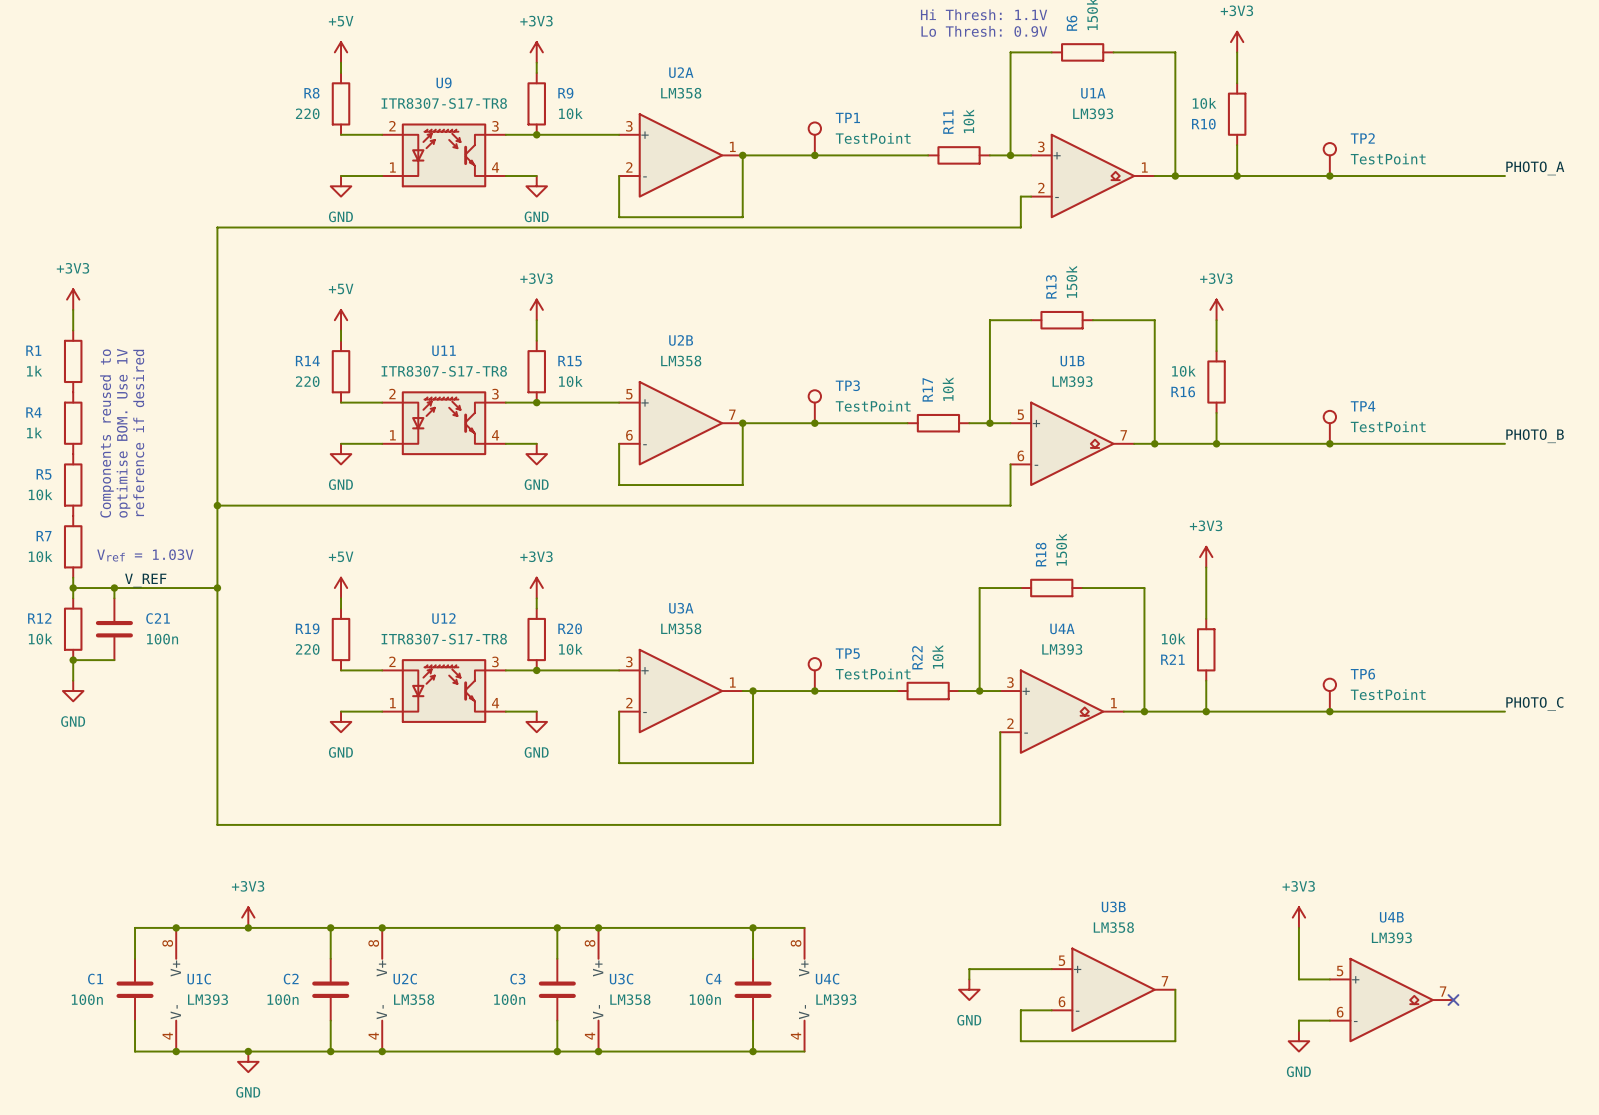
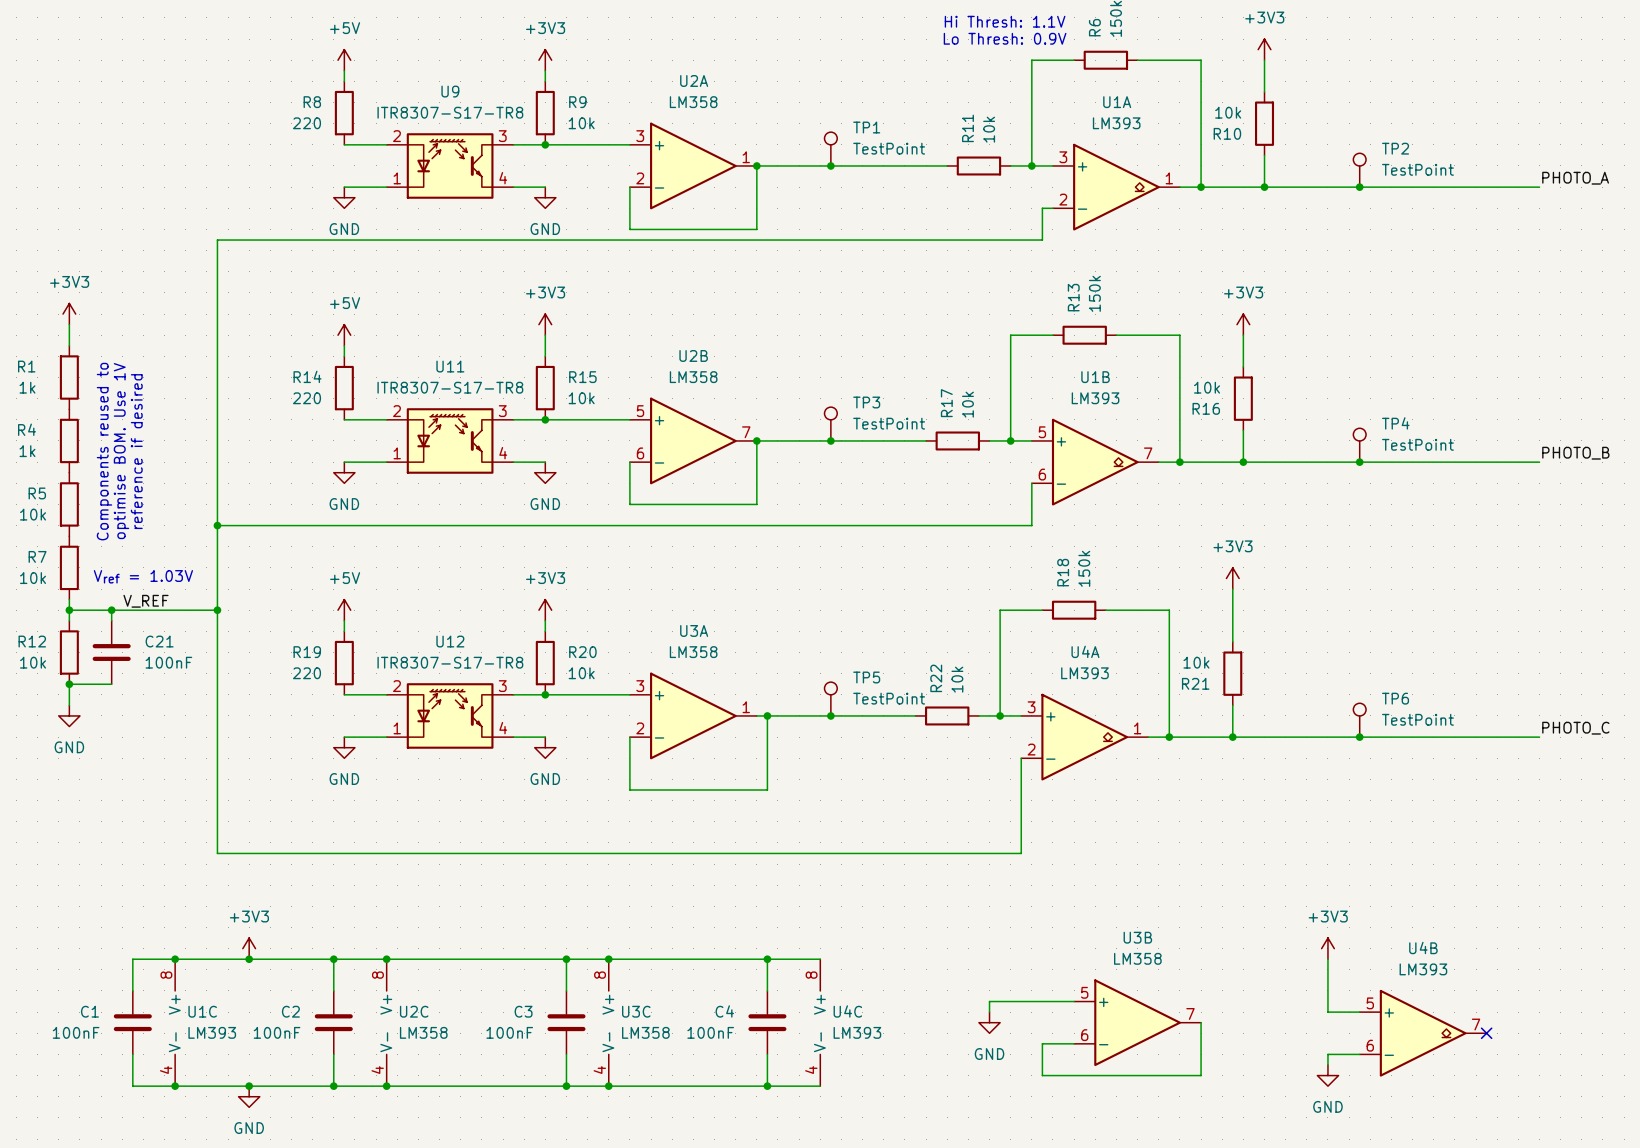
C21 value: 100n (162, 639) -> 100nF (168, 662)
C1 value: 100n (87, 999) -> 100nF (76, 1032)
C2 value: 100n (283, 999) -> 100nF (277, 1032)
C3 value: 100n (509, 999) -> 100nF (509, 1032)
C4 value: 100n (705, 999) -> 100nF (710, 1032)

